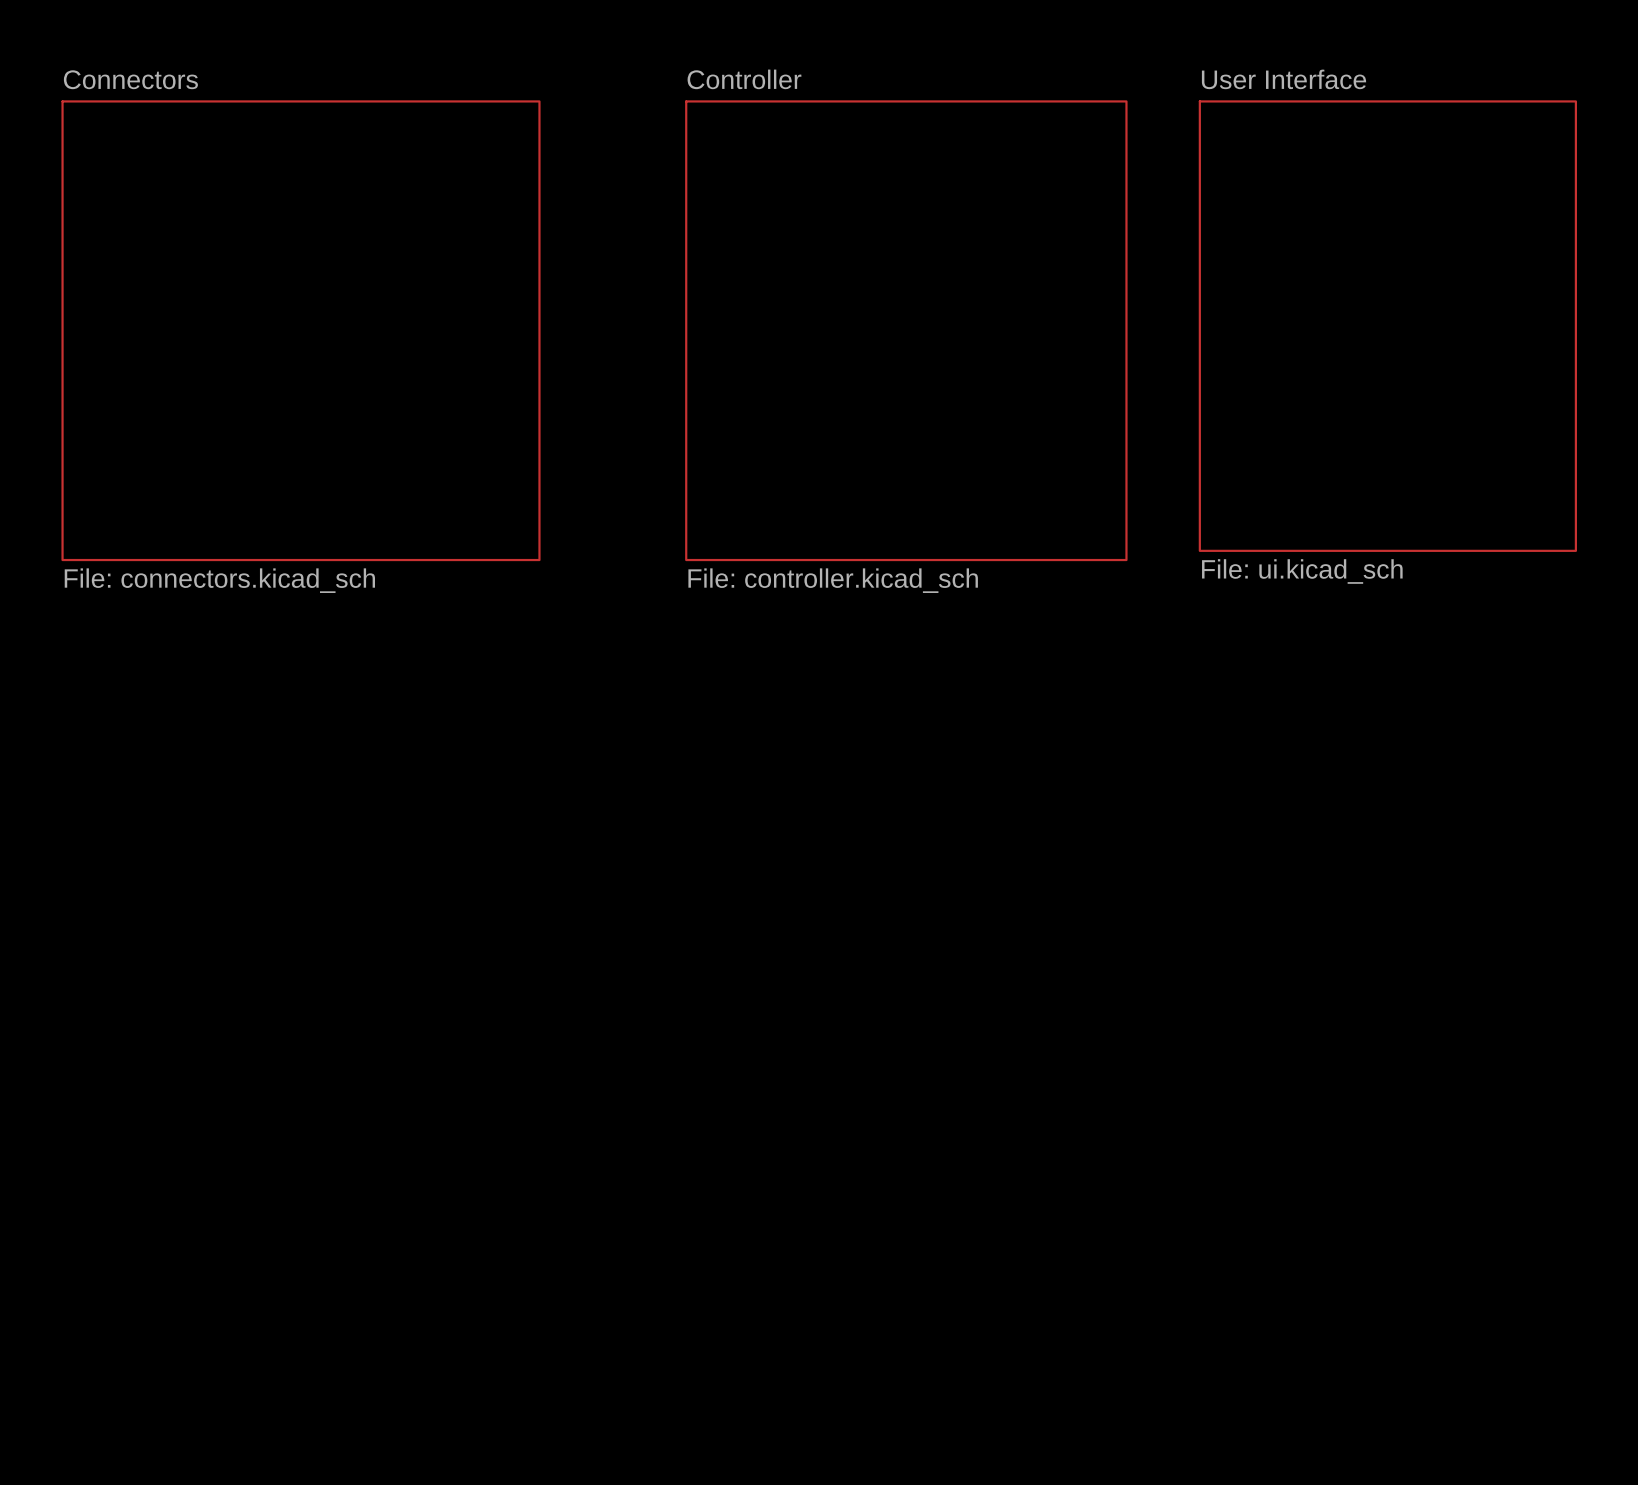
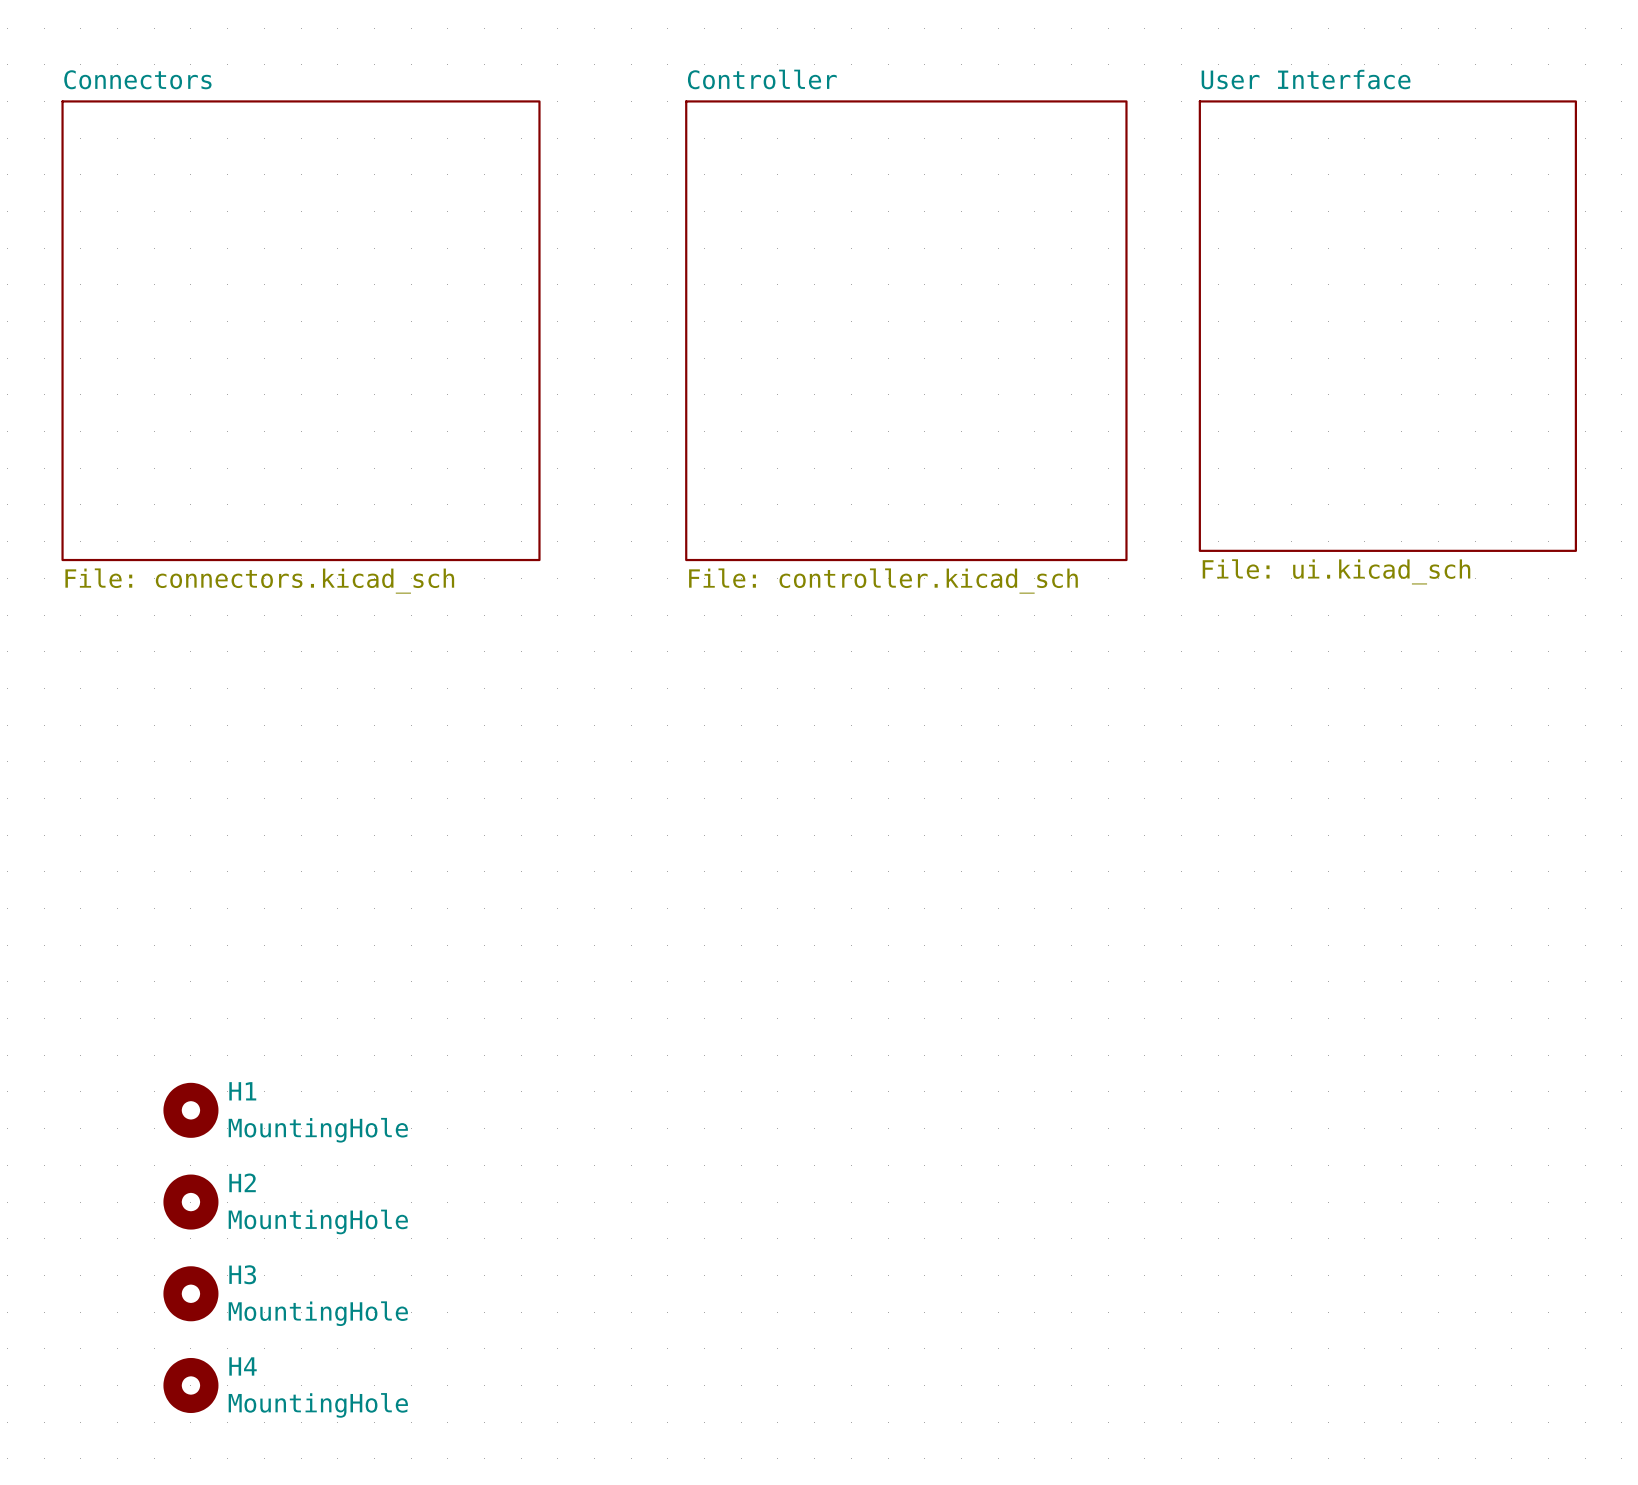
H1: none -> MountingHole (190, 1110)
H2: none -> MountingHole (190, 1202)
H3: none -> MountingHole (190, 1293)
H4: none -> MountingHole (190, 1385)

